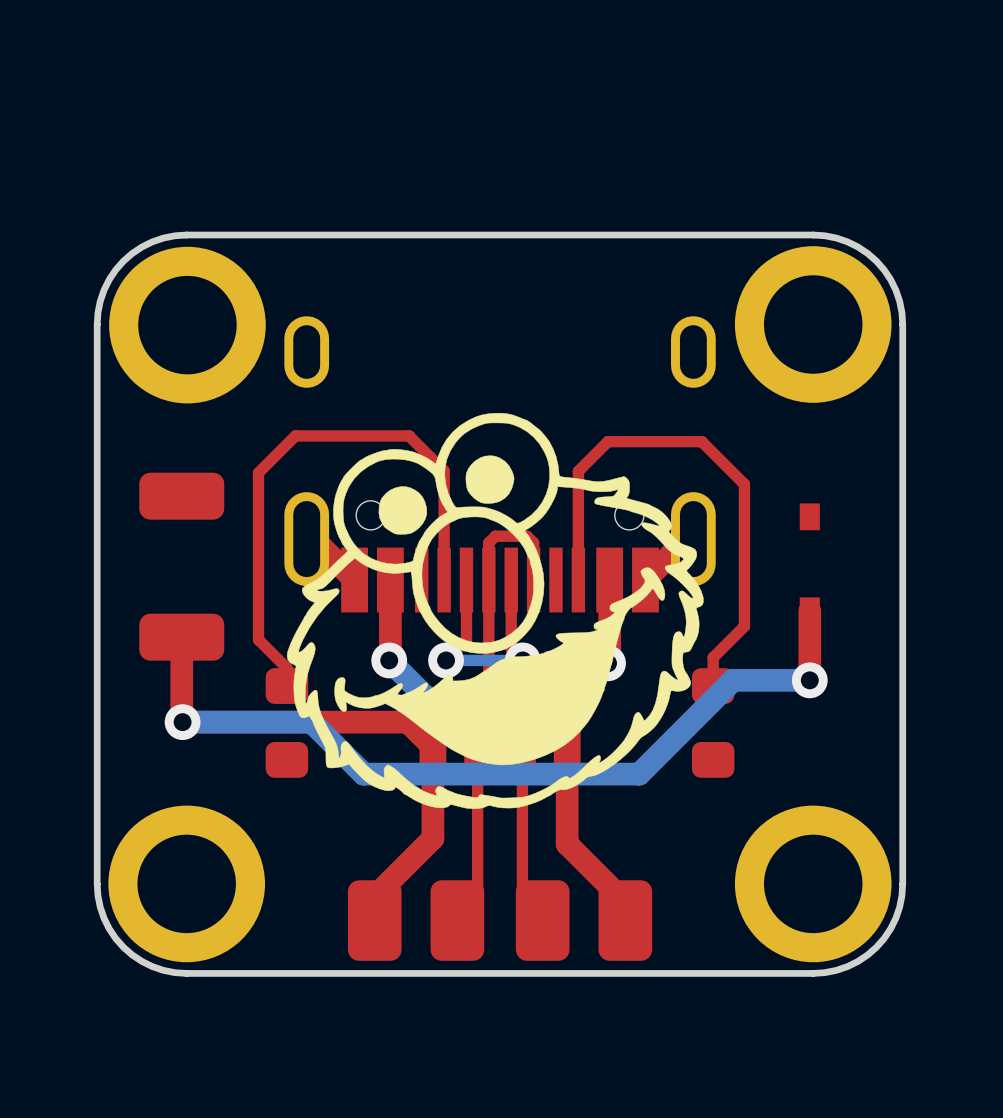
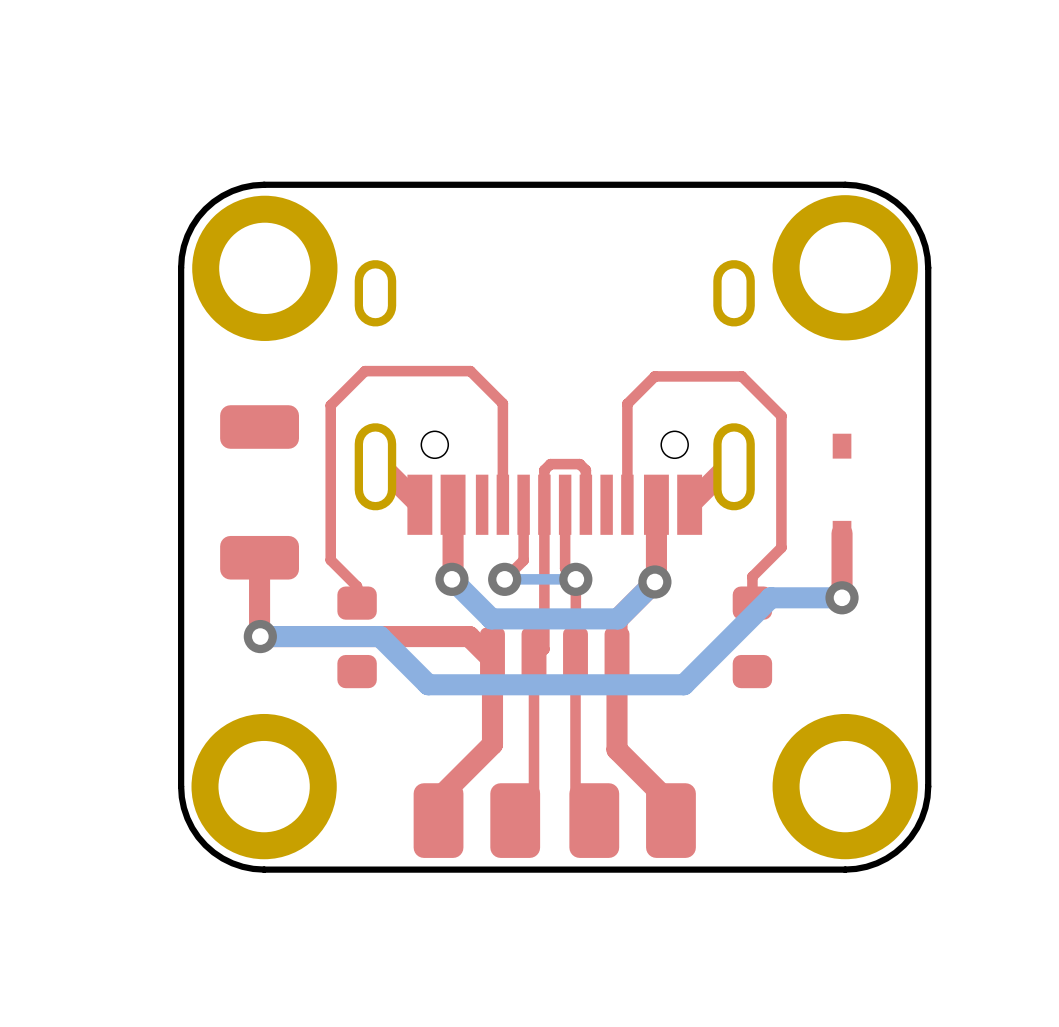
drawing: [286, 412, 704, 809] -> none

